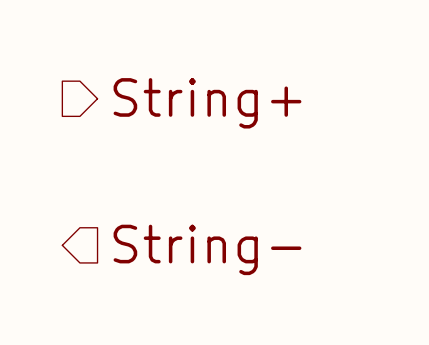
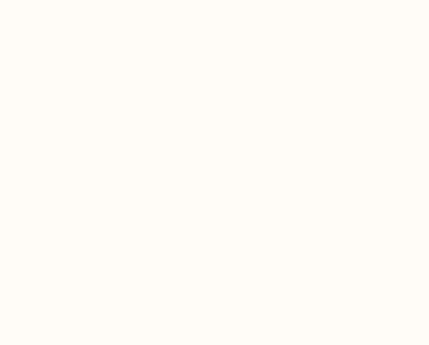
hierarchical label: String+ (207, 103) -> none
hierarchical label: String- (207, 249) -> none

